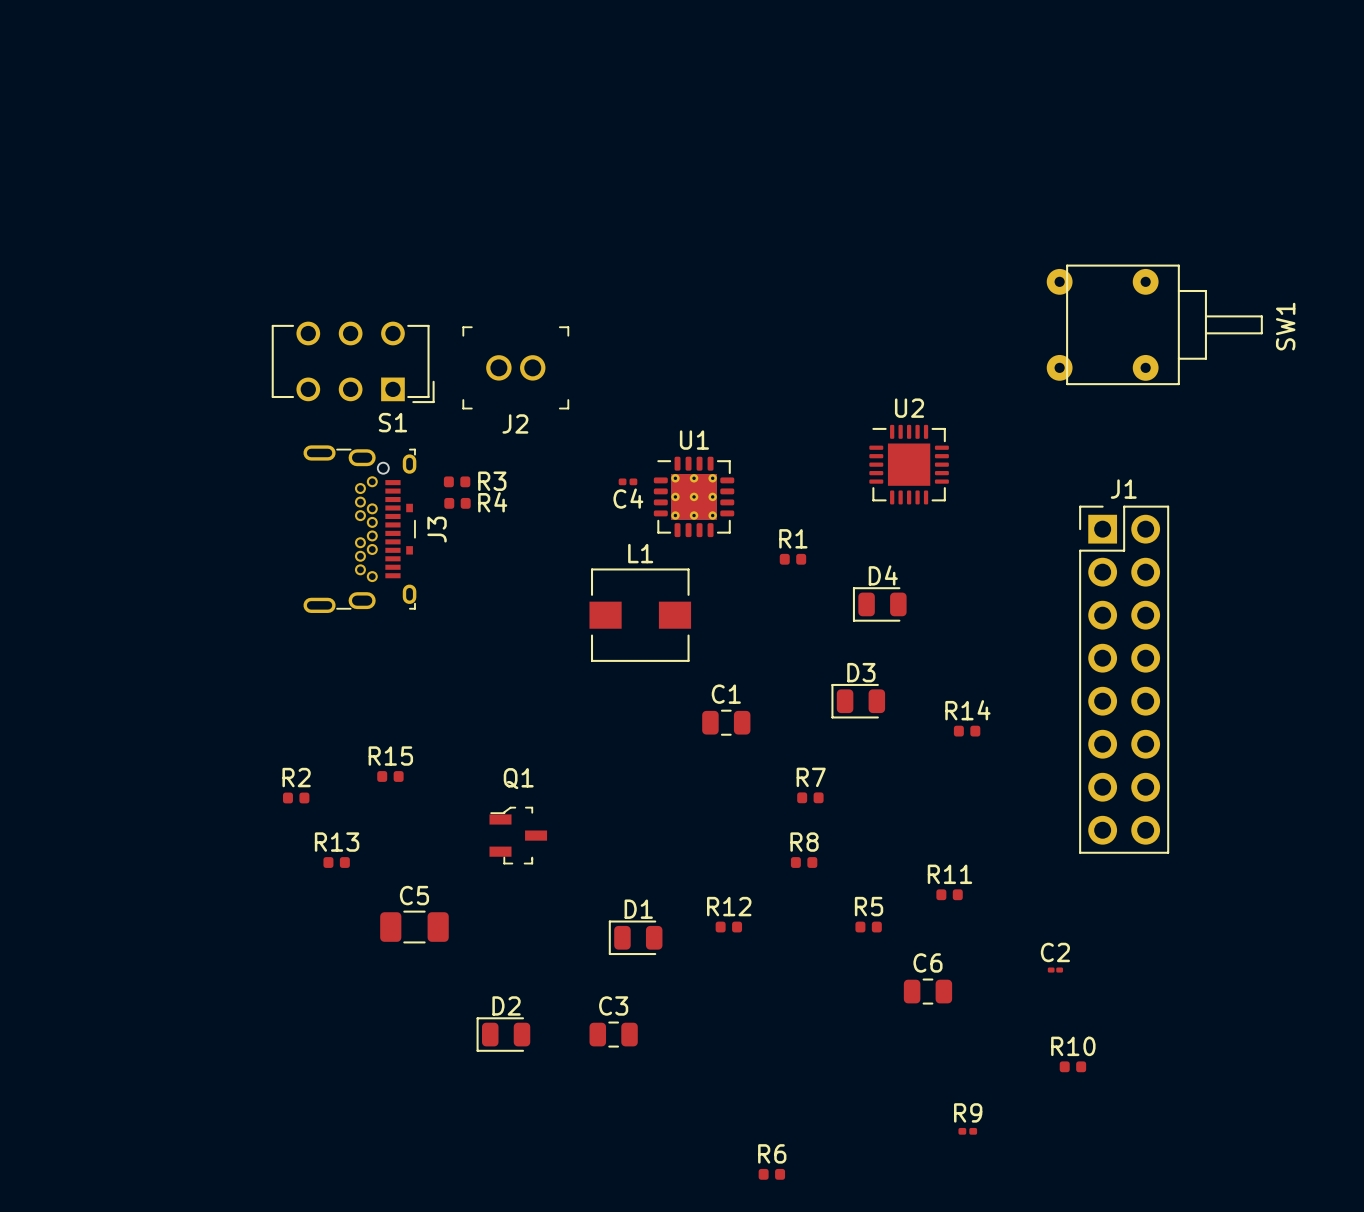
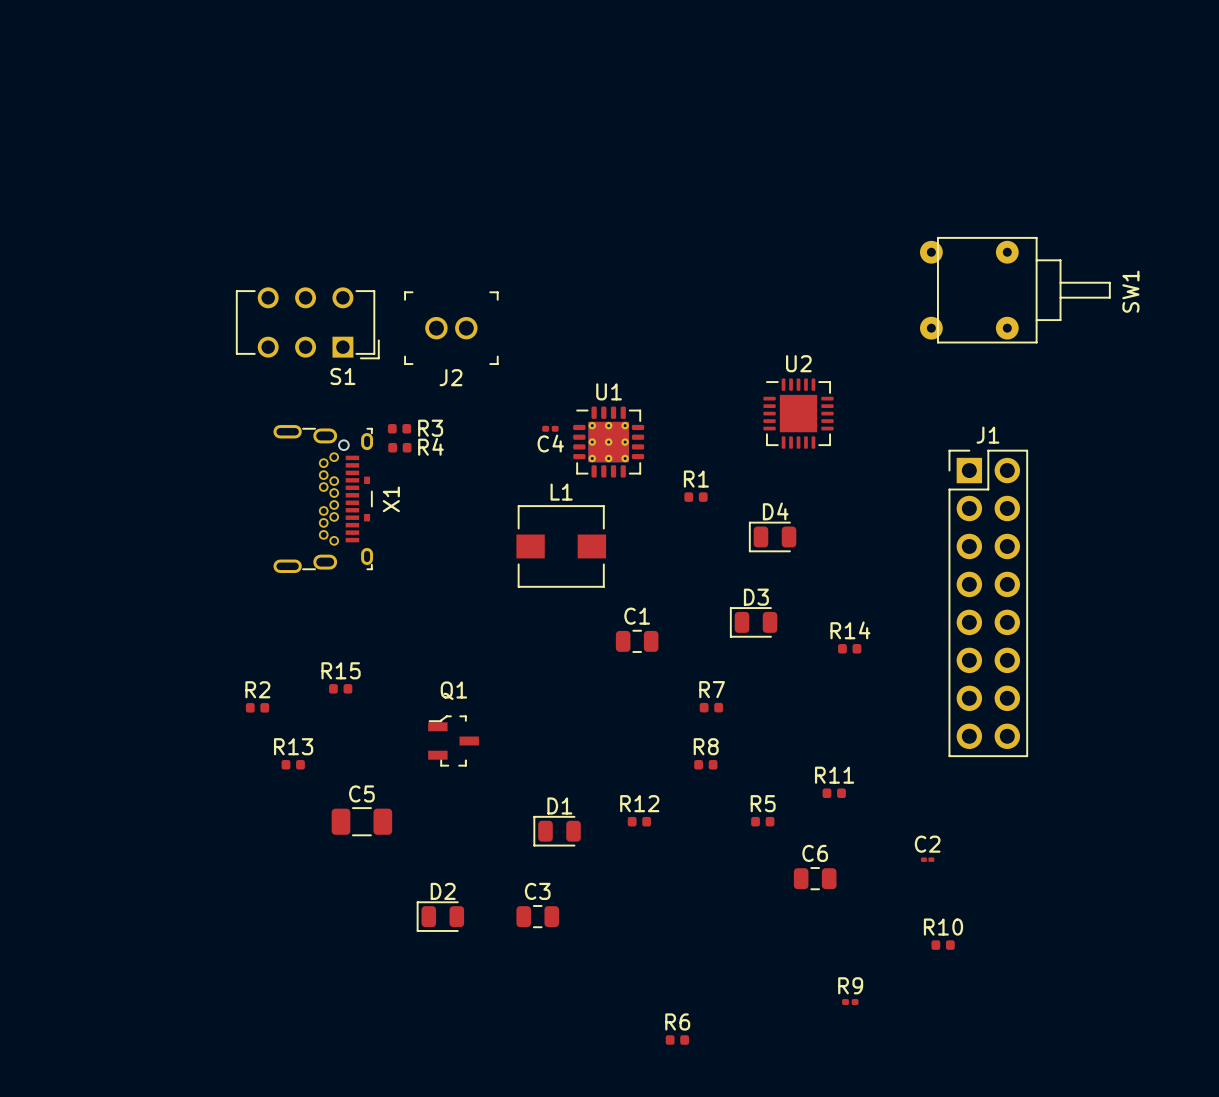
J3: (359, 529) -> none
X1: none -> (323, 499)

